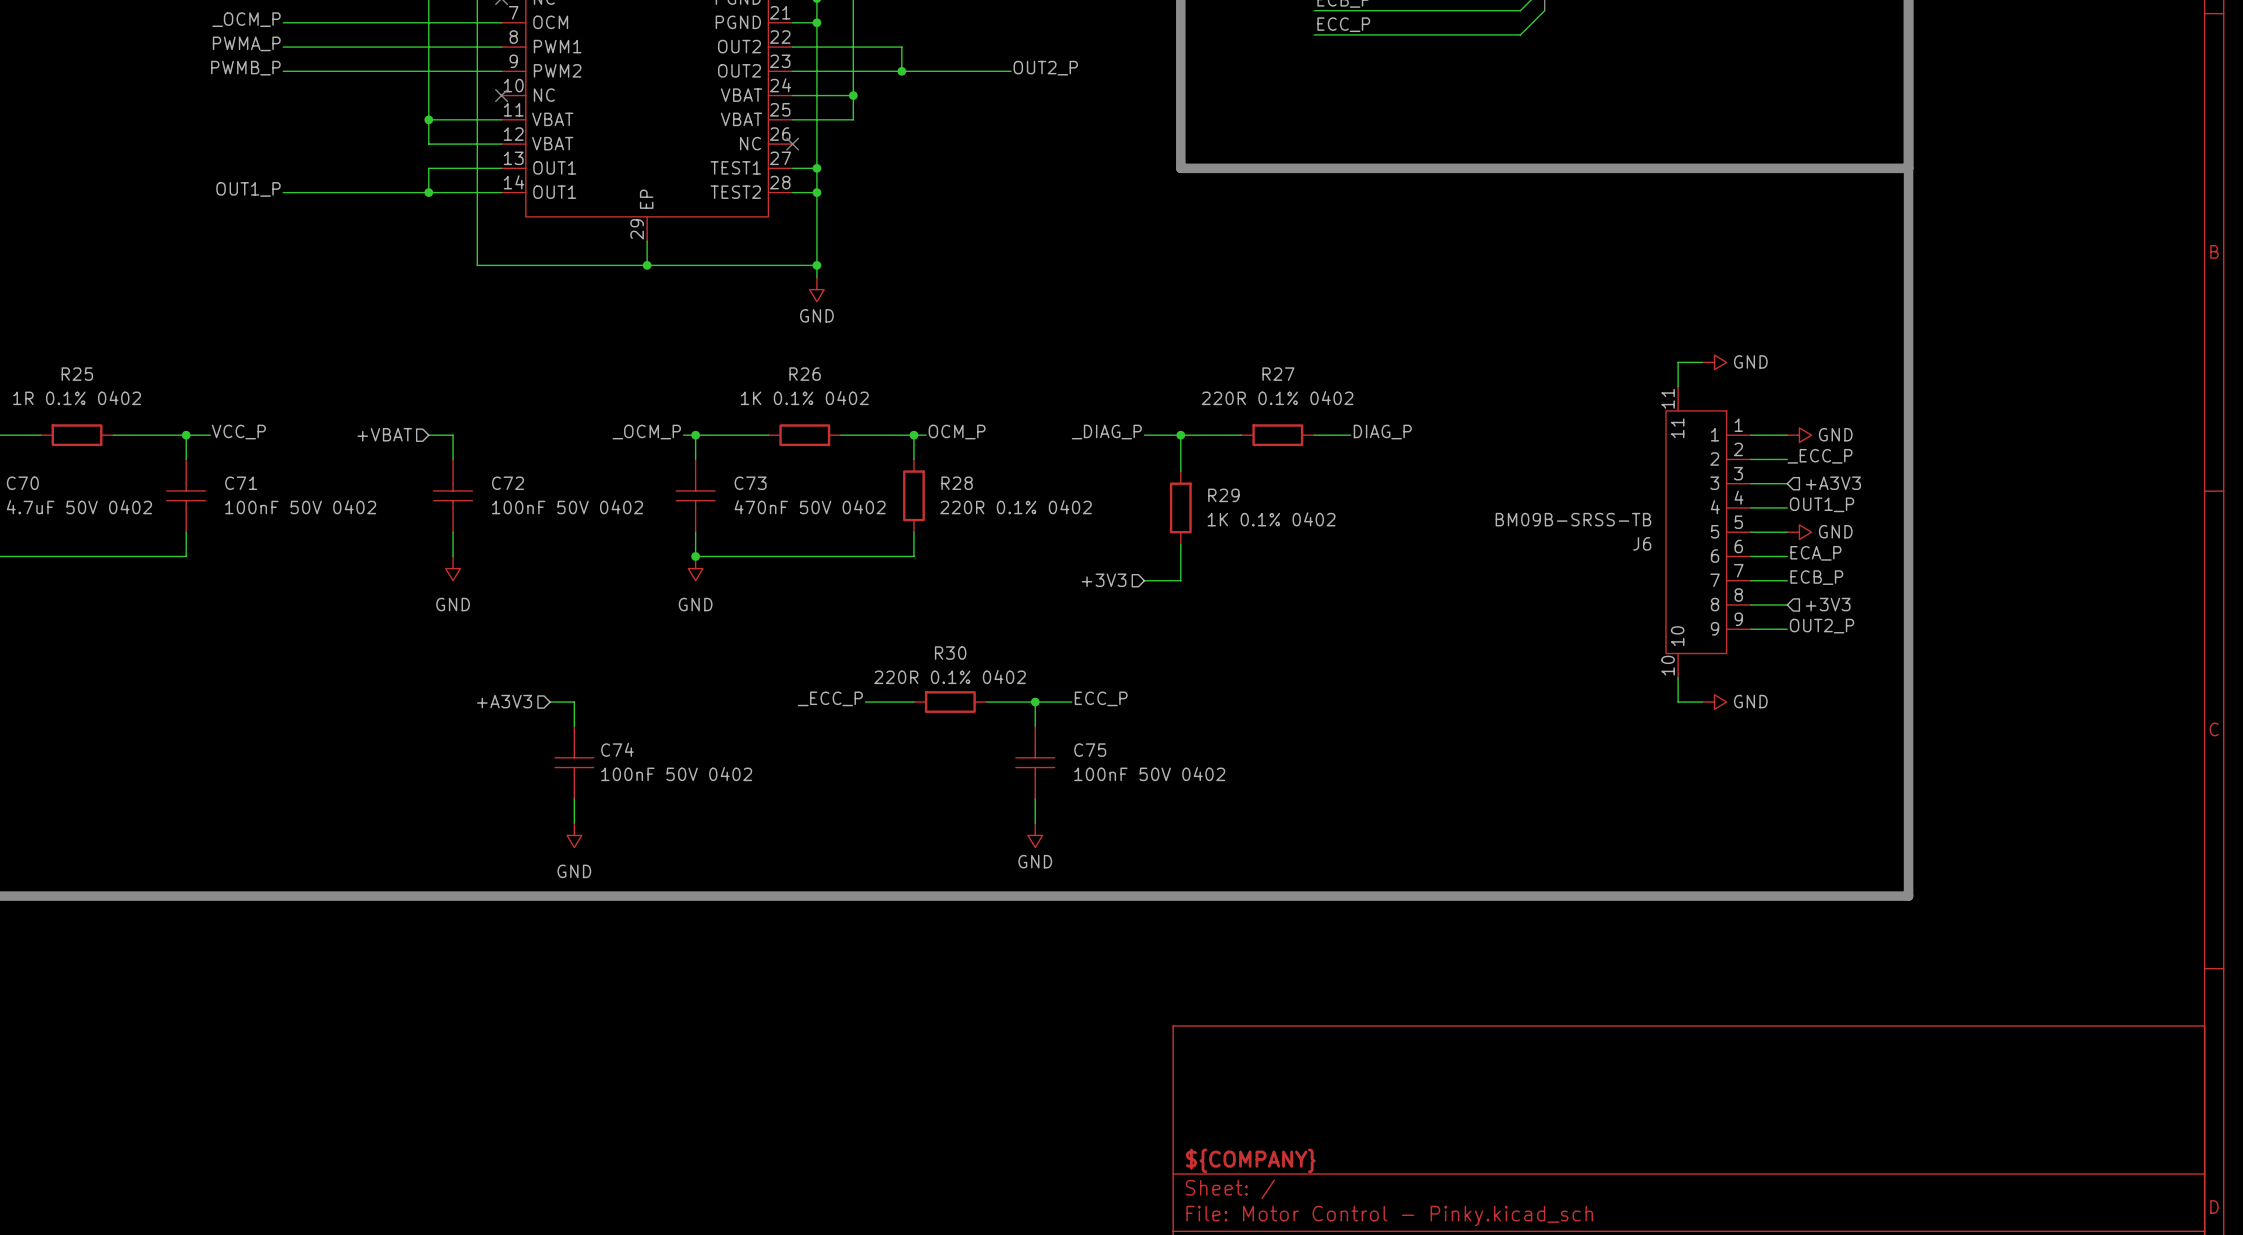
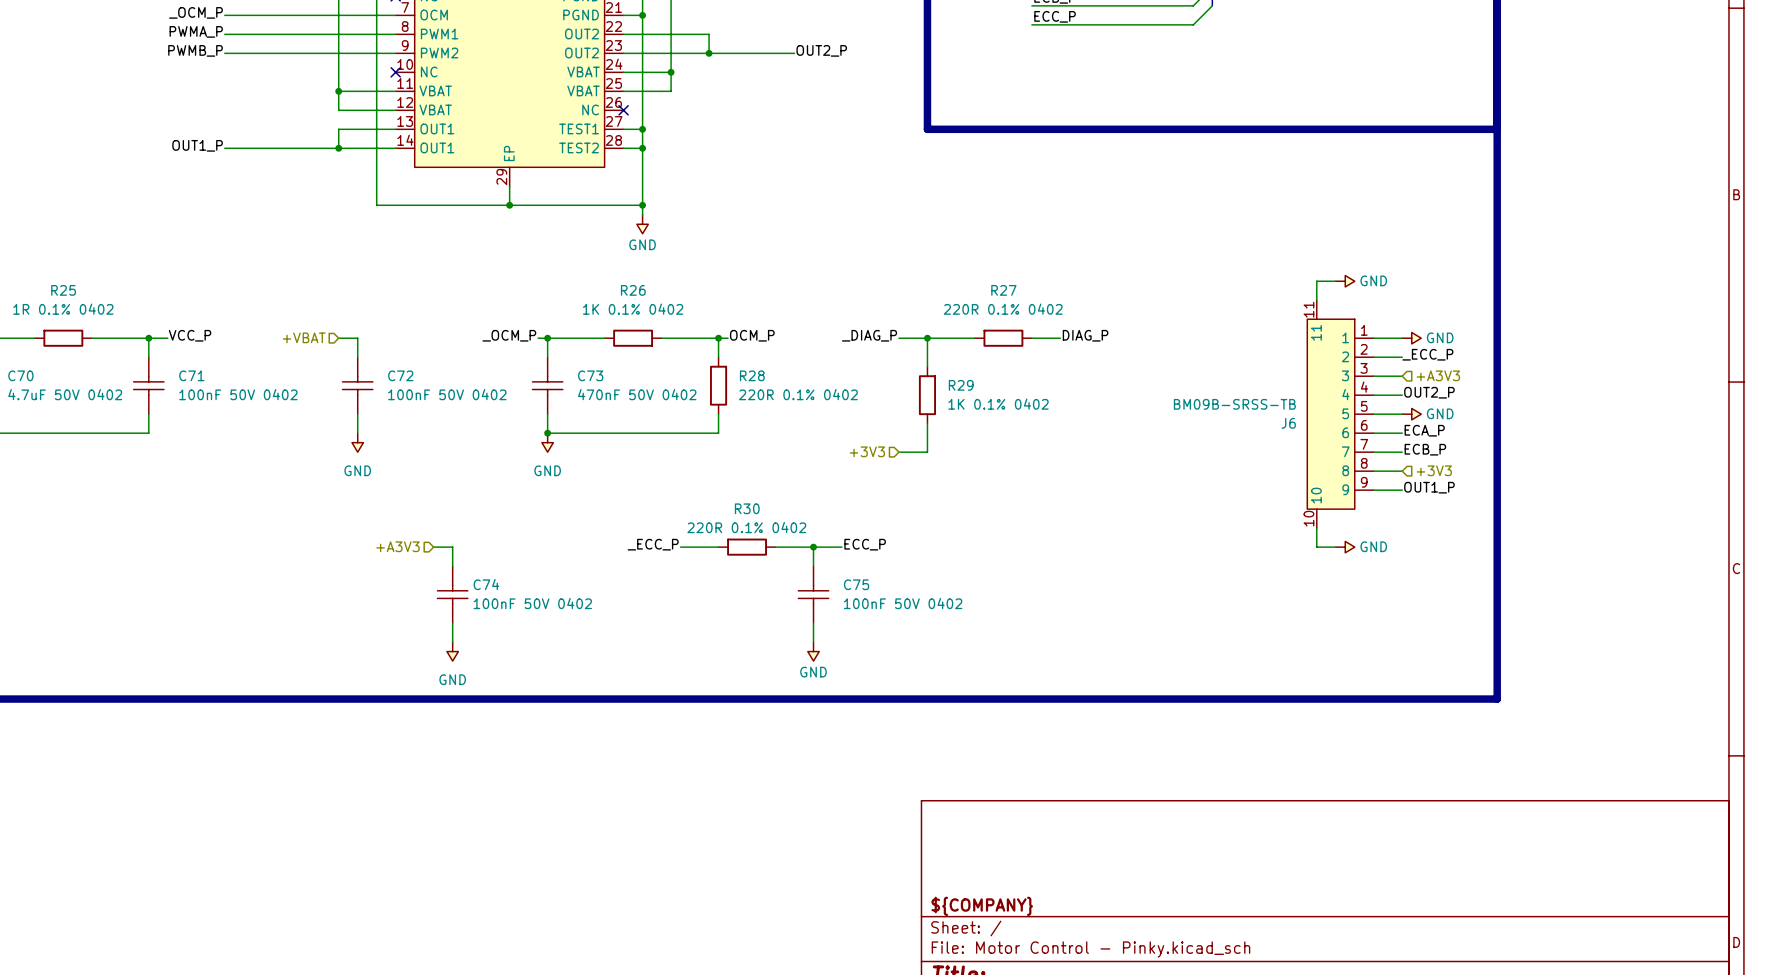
label: OUT1_P (1822, 504) -> OUT2_P (1429, 392)
label: OUT2_P (1822, 626) -> OUT1_P (1429, 487)

